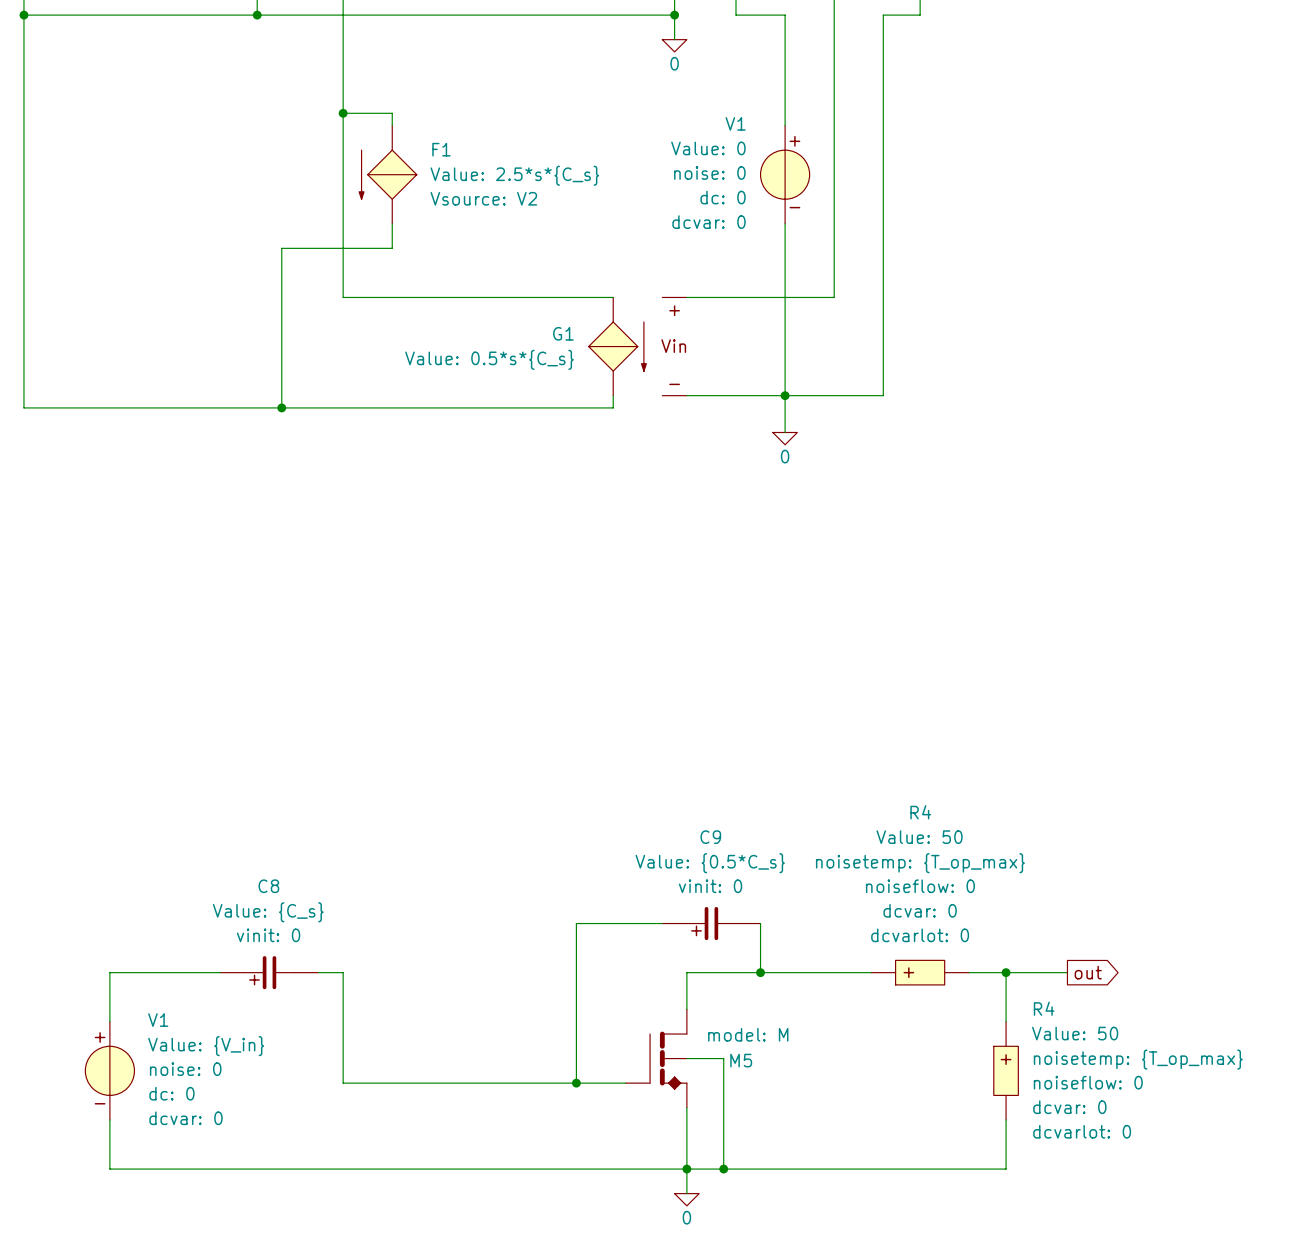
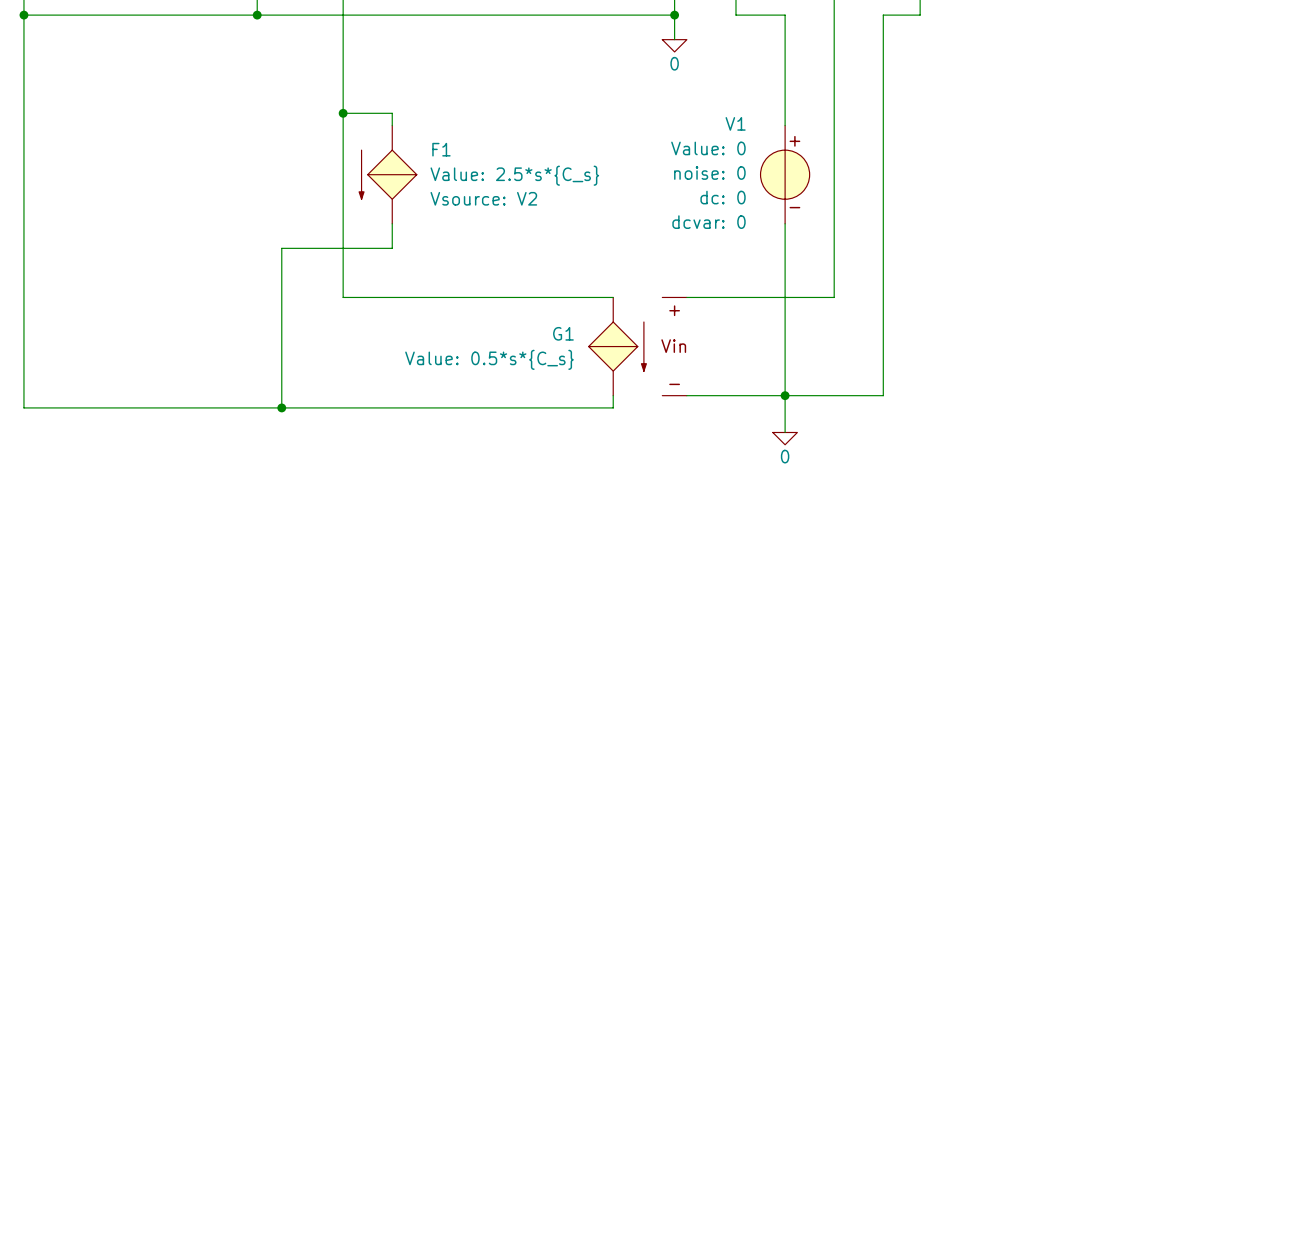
wire: (662, 923) (576, 923) (576, 1083) -> none
C9: Value: {0.5*C_s} (711, 923) -> none
wire: (760, 923) (760, 972) -> none
wire: (220, 972) (109, 972) (109, 1021) -> none
C8: Value: {C_s} (269, 972) -> none
wire: (318, 972) (343, 972) (343, 1083) (625, 1083) -> none
junction: (760, 972) -> none
wire: (871, 972) (686, 972) (686, 1009) -> none
R4: Value: 50 (920, 972) -> none
wire: (969, 972) (1067, 972) -> none
wire: (1006, 972) (1006, 1021) -> none
junction: (1006, 972) -> none
global label: out (1088, 972) -> none
M5: (656, 1058) -> none
wire: (686, 1058) (723, 1058) (723, 1169) -> none
V1: Value: {V_in} (109, 1070) -> none
R4: Value: 50 (1006, 1070) -> none
junction: (576, 1083) -> none
wire: (686, 1107) (686, 1193) -> none
wire: (109, 1119) (109, 1169) (1006, 1169) (1006, 1119) -> none
junction: (686, 1169) -> none
junction: (723, 1169) -> none
power symbol: 0 (686, 1199) -> none

